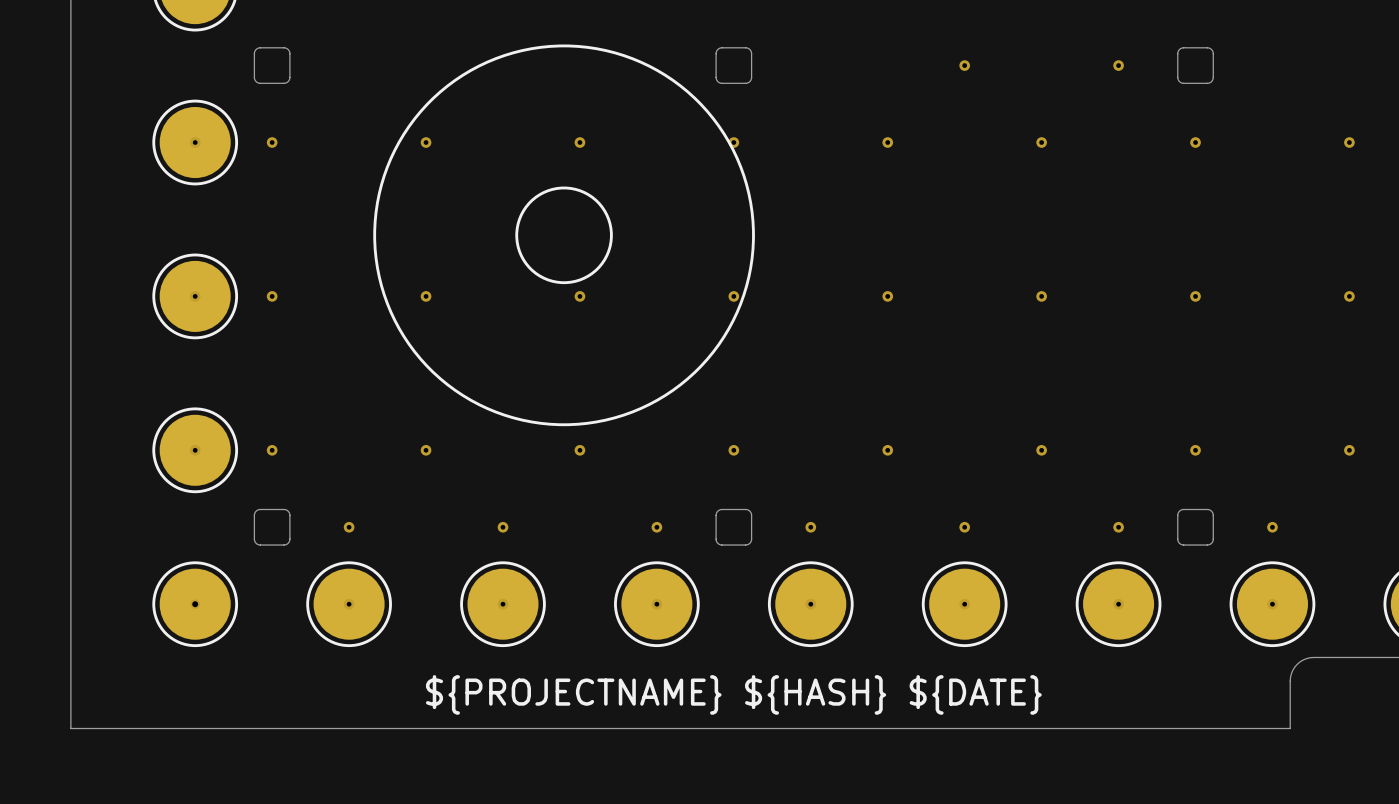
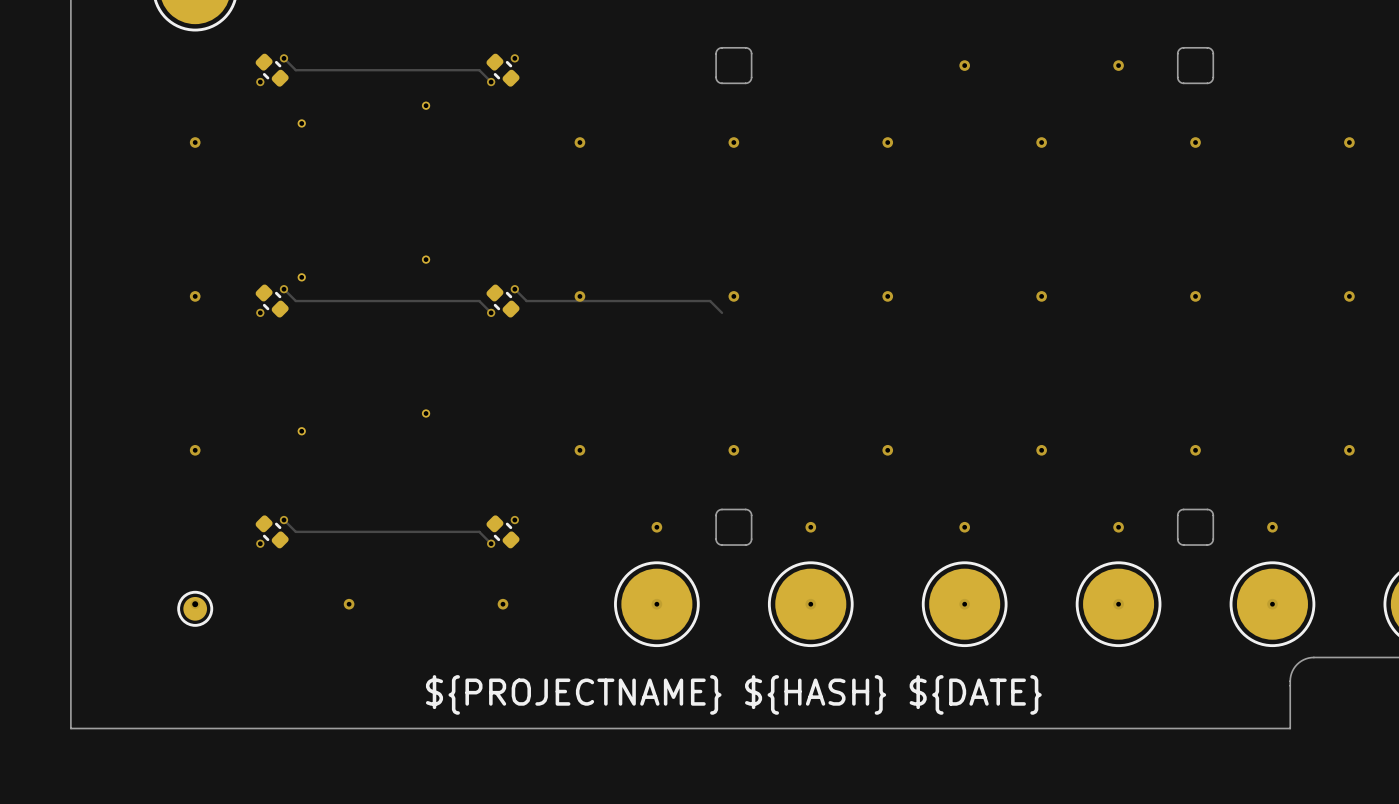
drawing: [373, 44, 755, 427] -> none
board edge: (283, 47) (259, 47) (255, 50) (254, 77) (256, 82) (283, 83) (288, 81) (289, 53) (283, 47) -> none
track: none -> (283, 58) (295, 70) (479, 70) (491, 82)
via: none -> (283, 58)
via: none -> (514, 58)
part: none -> (272, 70)
part: none -> (502, 70)
via: none -> (260, 82)
via: none -> (491, 82)
part: none -> (426, 105)
part: none -> (301, 123)
part: (195, 142) -> none
via: (272, 142) -> none
via: (426, 142) -> none
part: none -> (426, 259)
part: none -> (301, 277)
track: none -> (283, 289) (295, 301) (479, 301) (491, 312)
via: none -> (283, 289)
track: none -> (514, 289) (526, 301) (710, 301) (722, 312)
via: none -> (514, 289)
part: (195, 296) -> none
via: (272, 296) -> none
via: (426, 296) -> none
part: none -> (272, 301)
part: none -> (502, 301)
via: none -> (260, 312)
via: none -> (491, 312)
part: none -> (426, 413)
part: none -> (301, 431)
part: (195, 450) -> none
via: (272, 450) -> none
via: (426, 450) -> none
board edge: (283, 509) (259, 509) (255, 511) (254, 539) (256, 543) (283, 545) (288, 542) (289, 514) (283, 509) -> none
track: none -> (283, 520) (295, 531) (479, 531) (491, 543)
via: none -> (283, 520)
via: none -> (514, 520)
via: (349, 527) -> none
via: (502, 527) -> none
part: none -> (272, 531)
part: none -> (502, 531)
via: none -> (260, 543)
via: none -> (491, 543)
part footprint: [152, 561, 239, 648] -> [177, 590, 214, 627]
part: (349, 604) -> none
part: (502, 604) -> none

